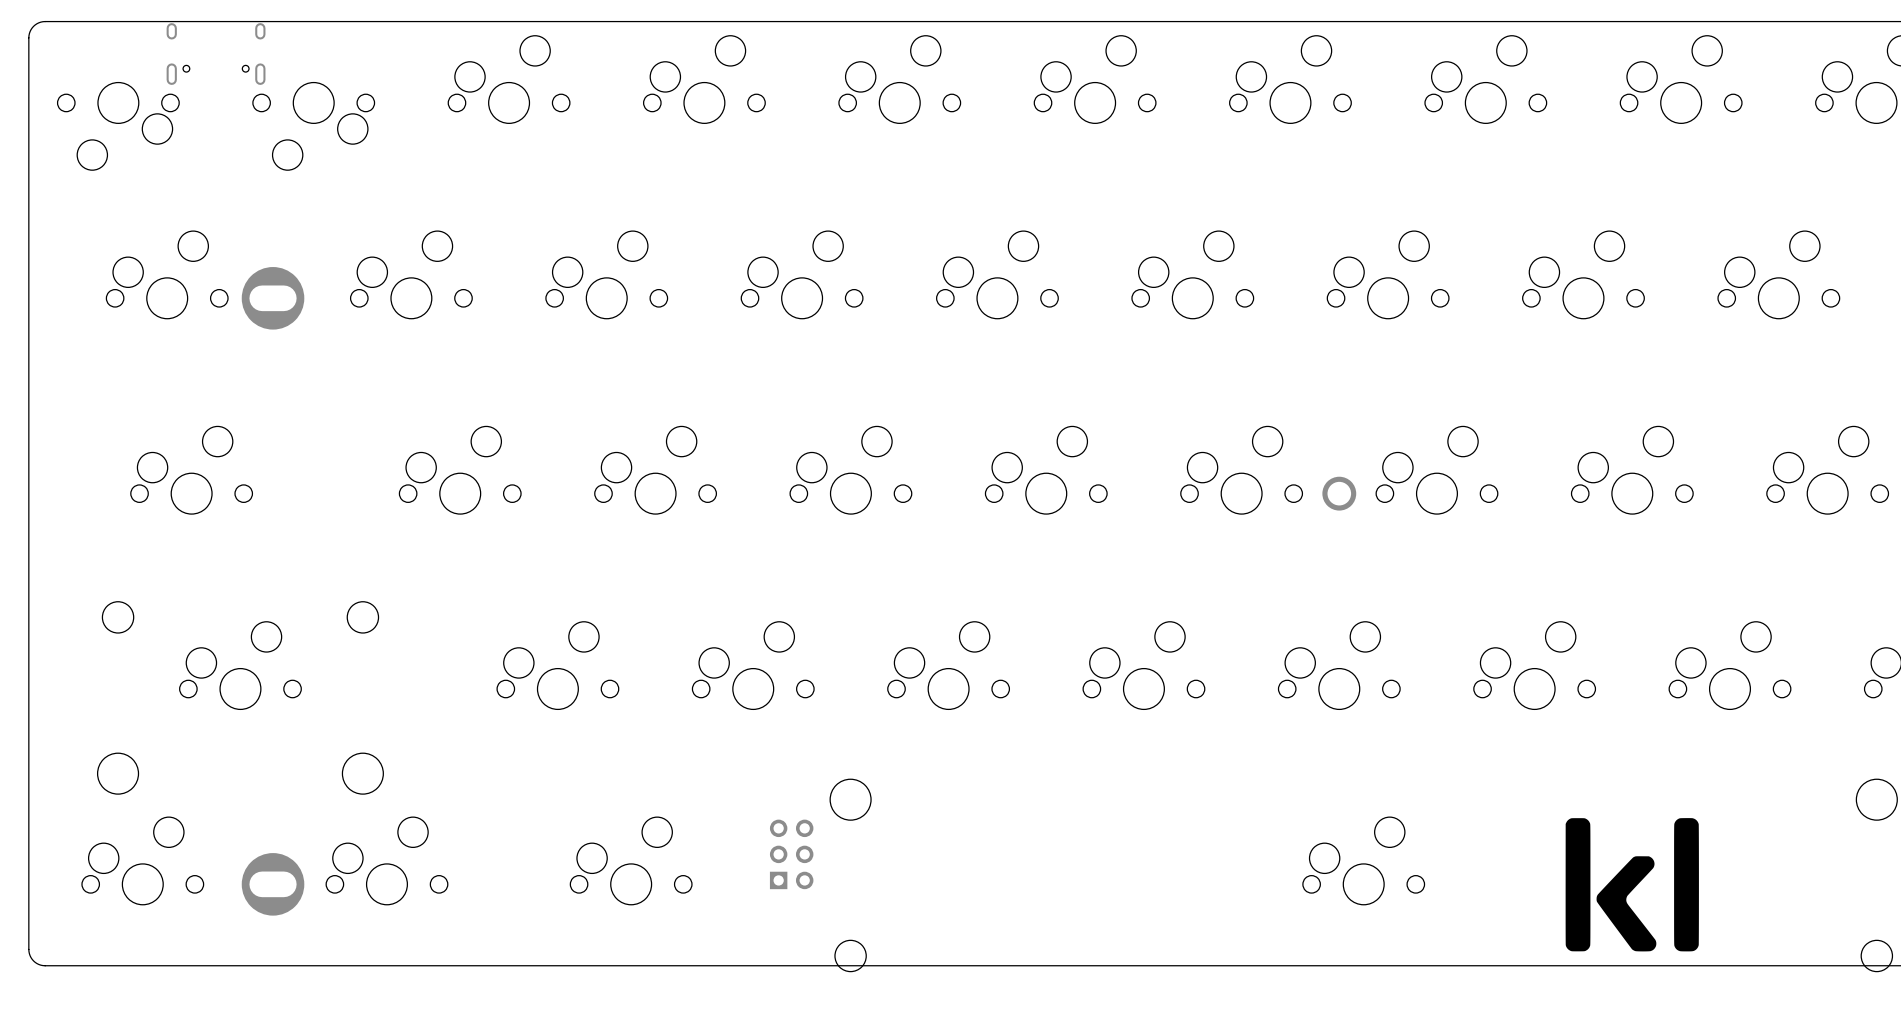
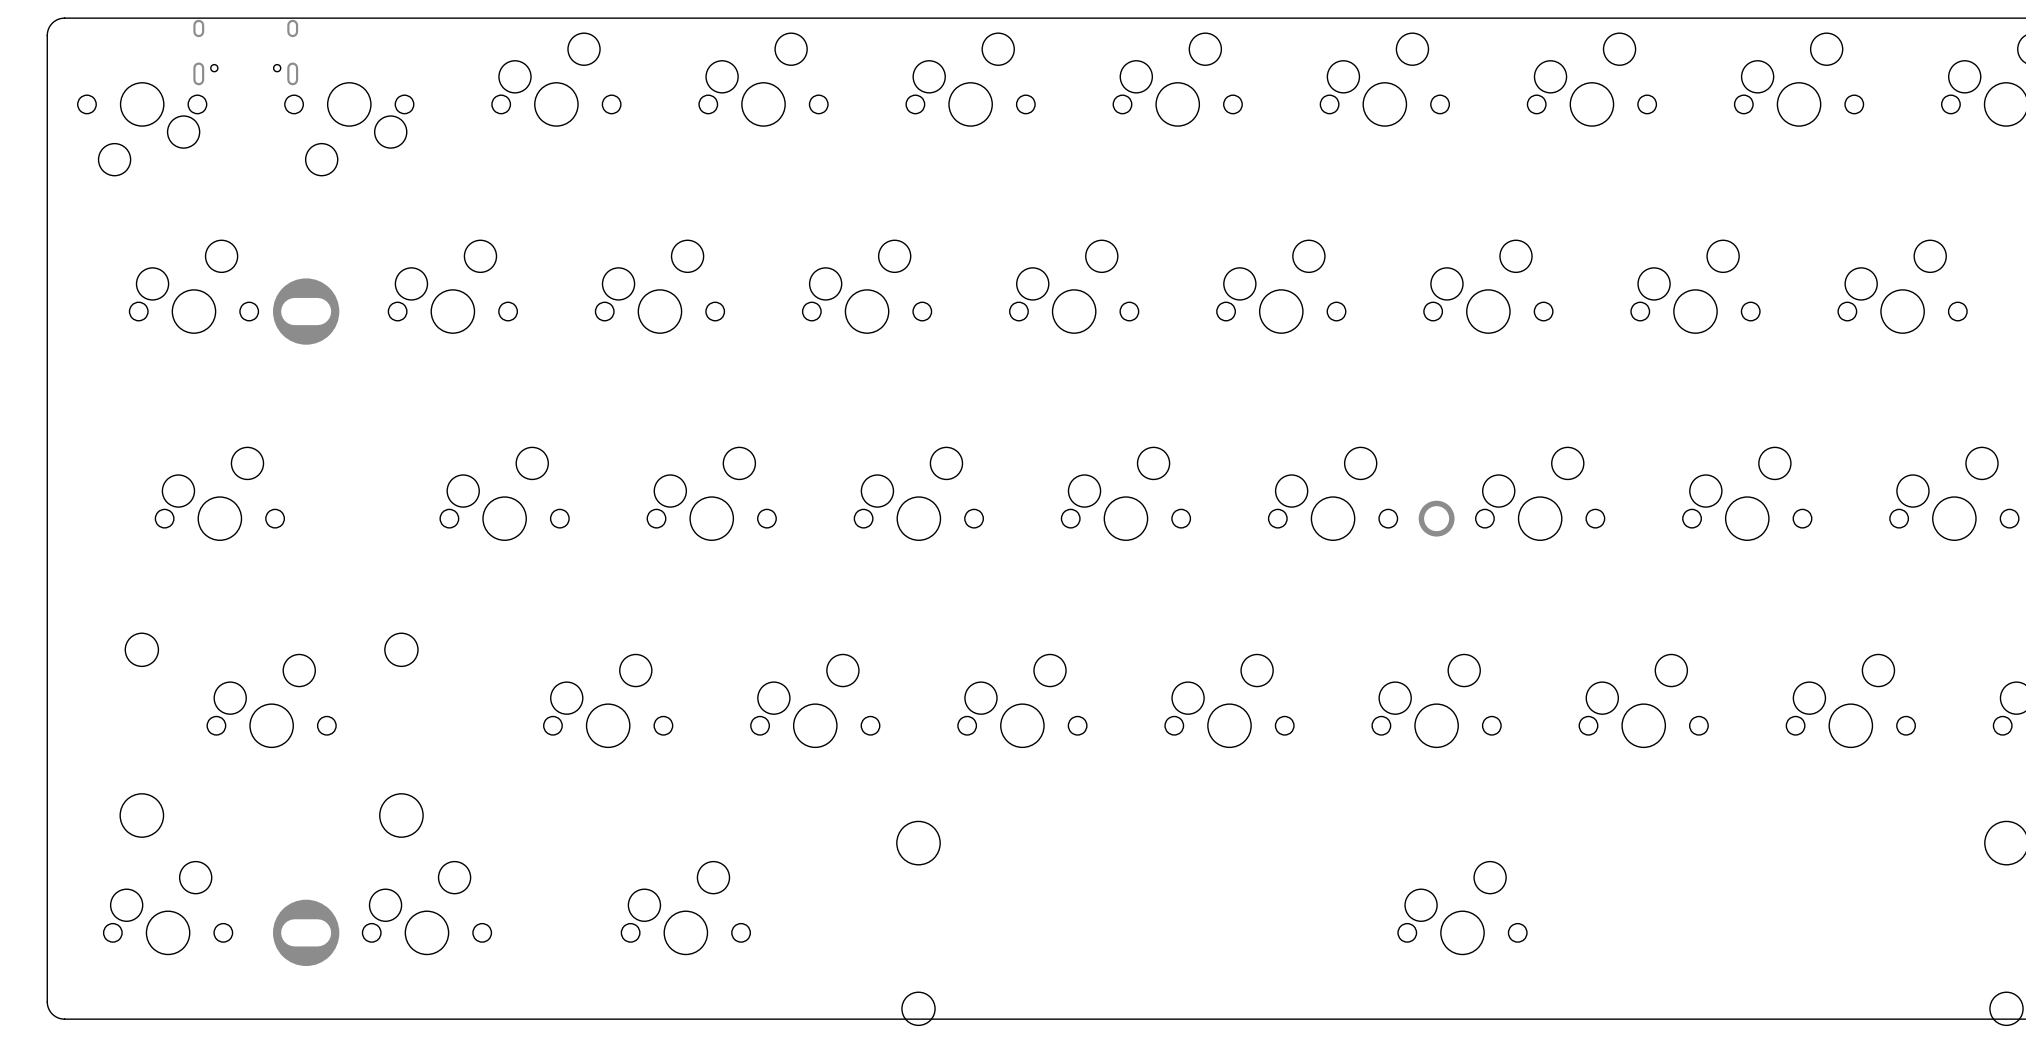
drawing: [1565, 818, 1699, 952] -> none
part: (791, 854) -> none

